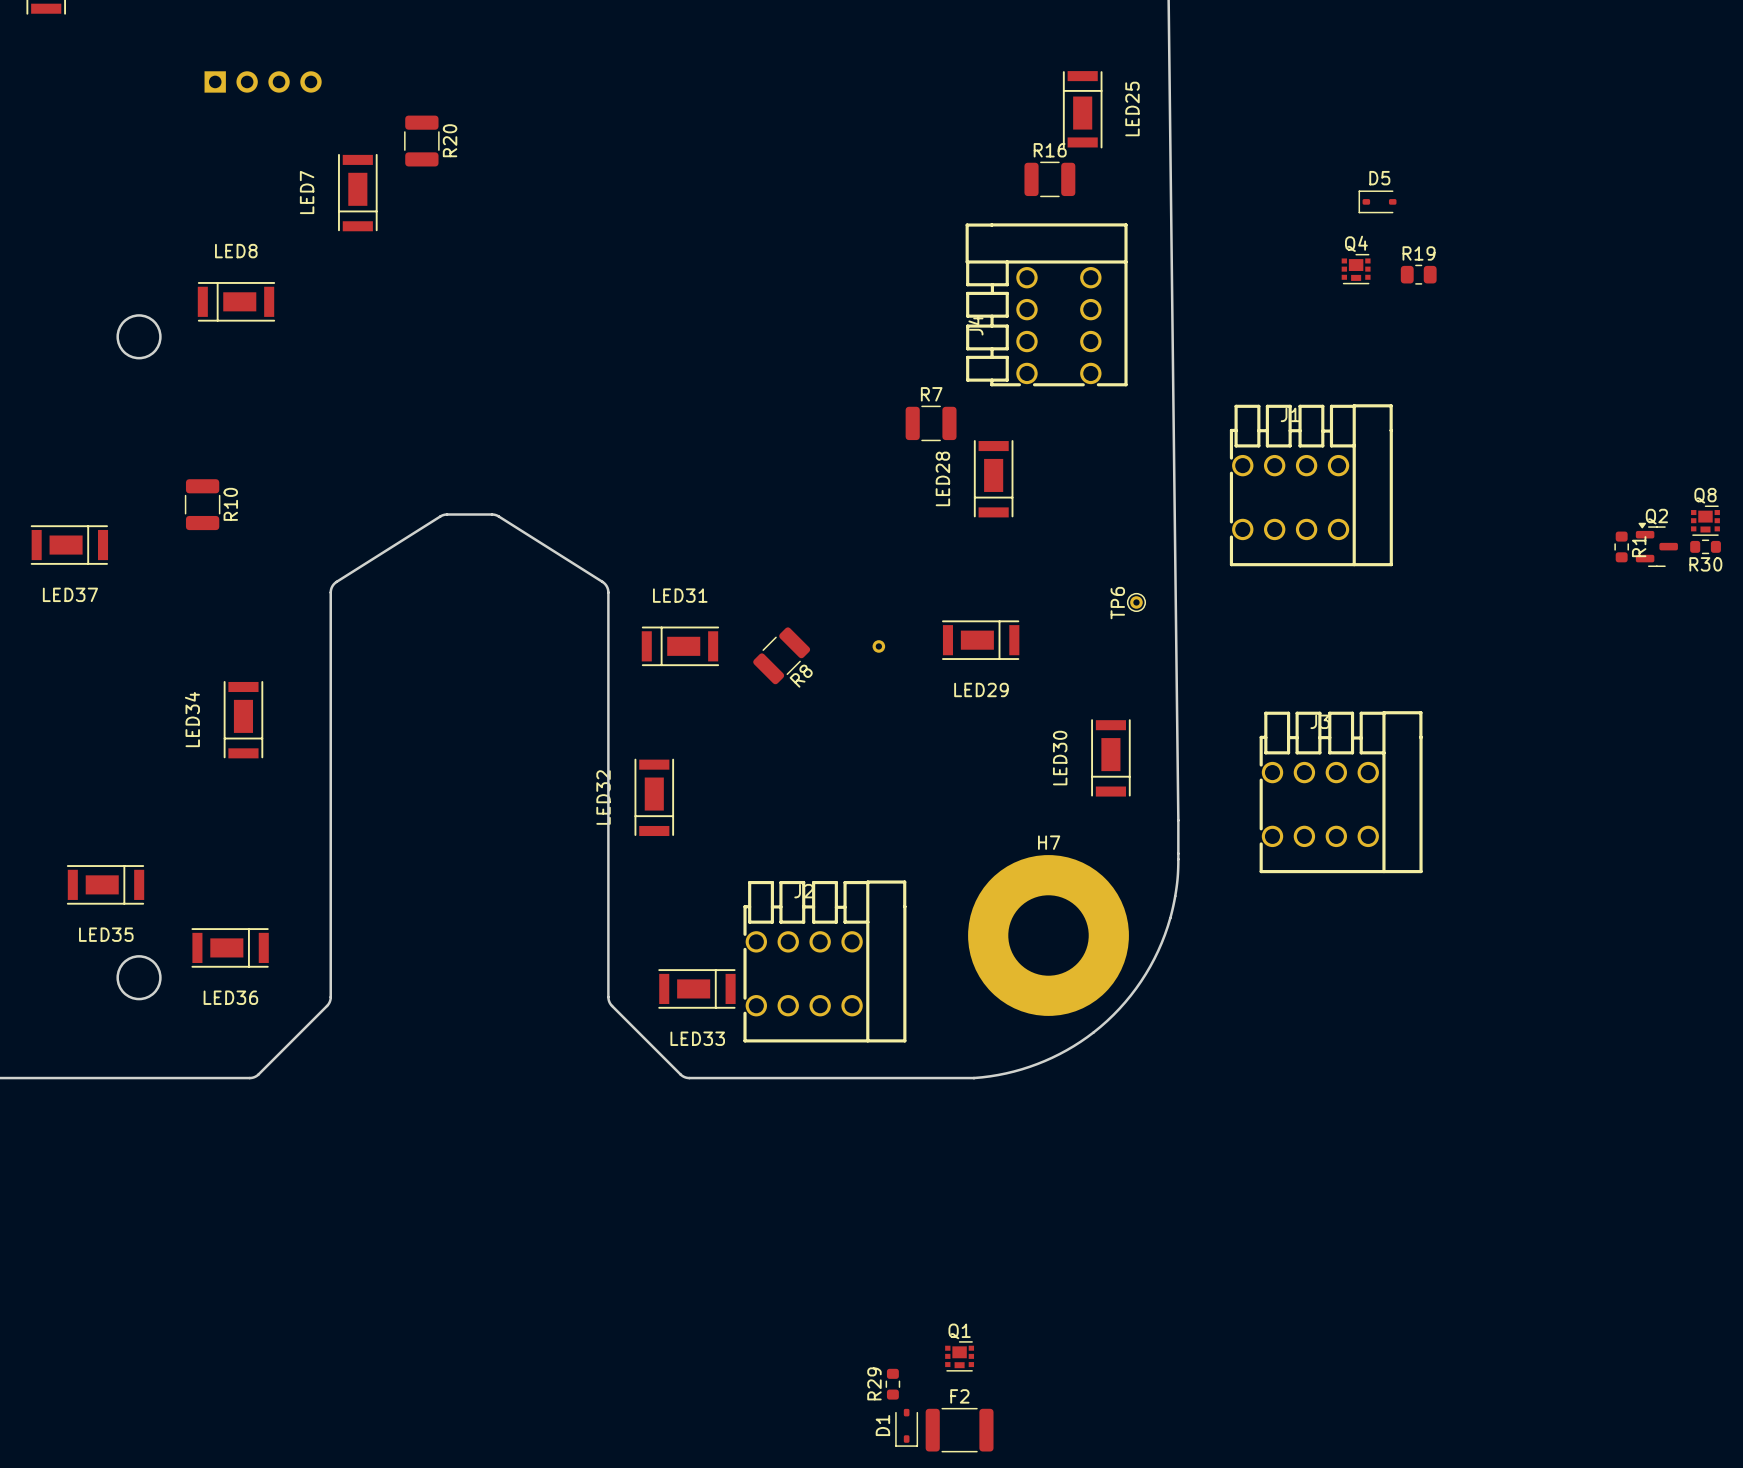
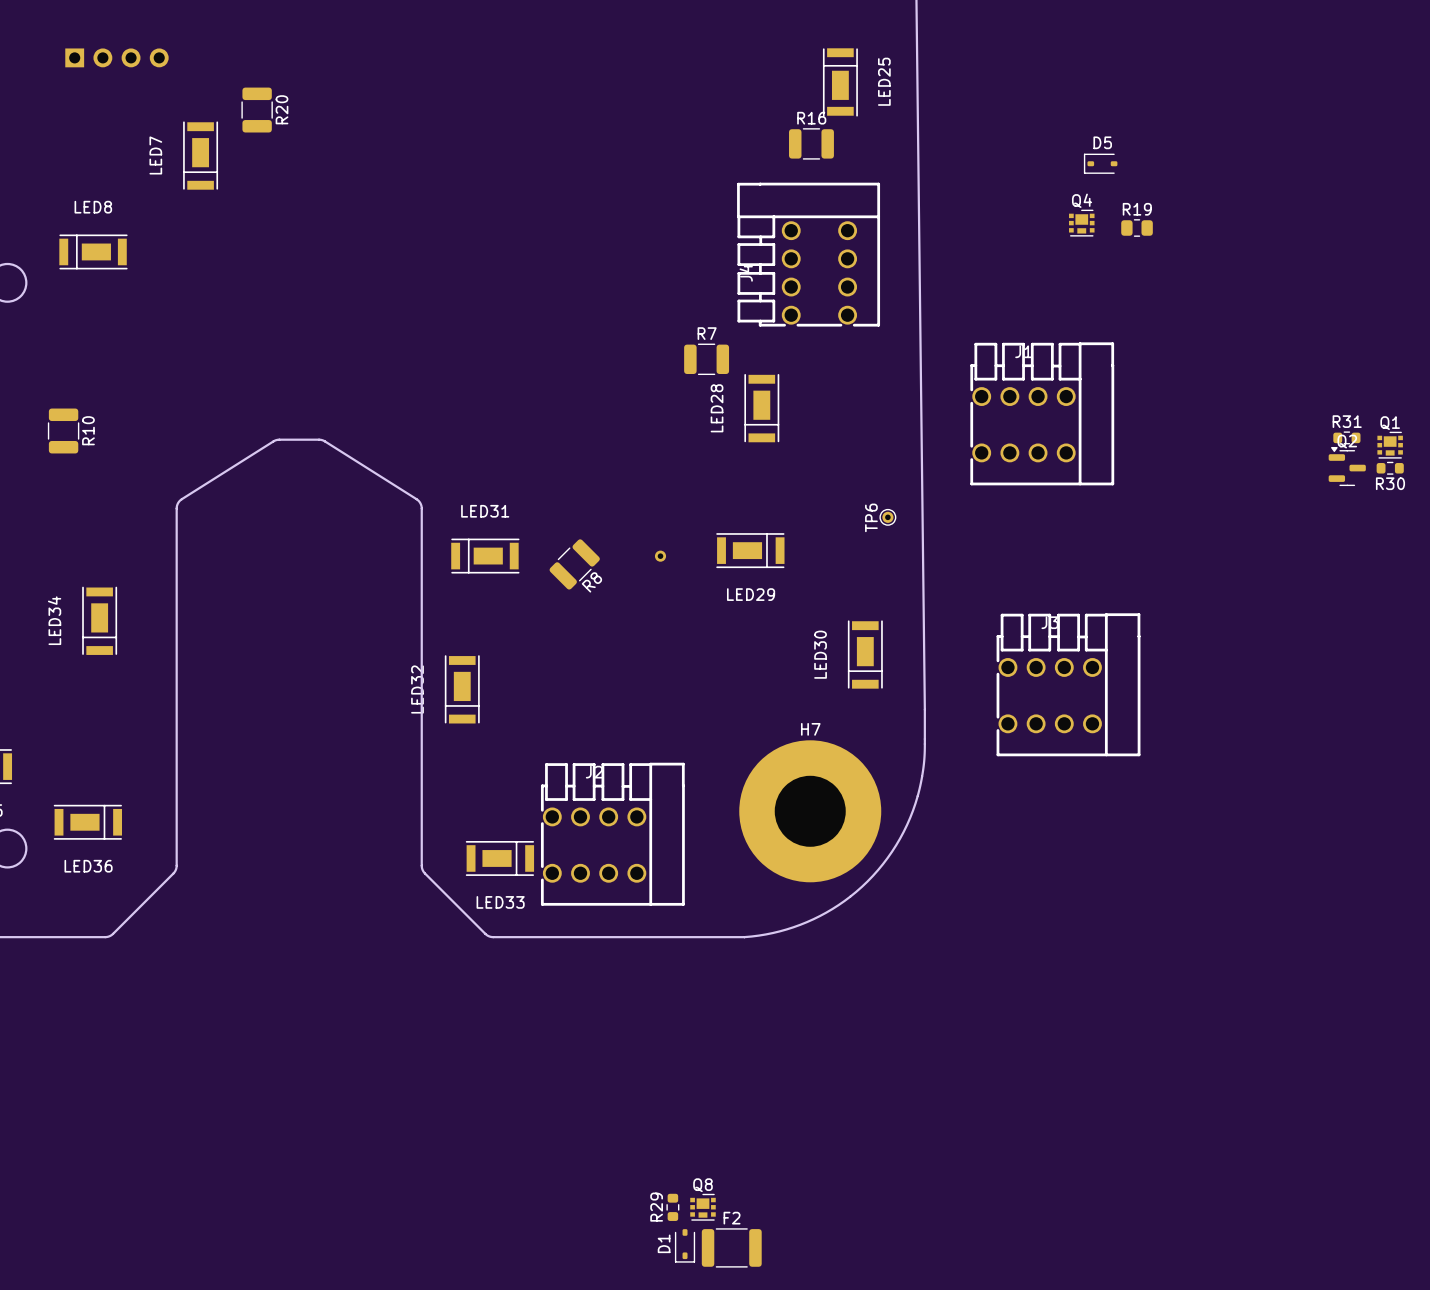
Q8 name: Q8 (1705, 495) -> Q1 (1390, 423)
R31: none -> (1346, 437)
R1: (1621, 546) -> none
Q1: (959, 1356) -> none
Q8: none -> (702, 1207)

